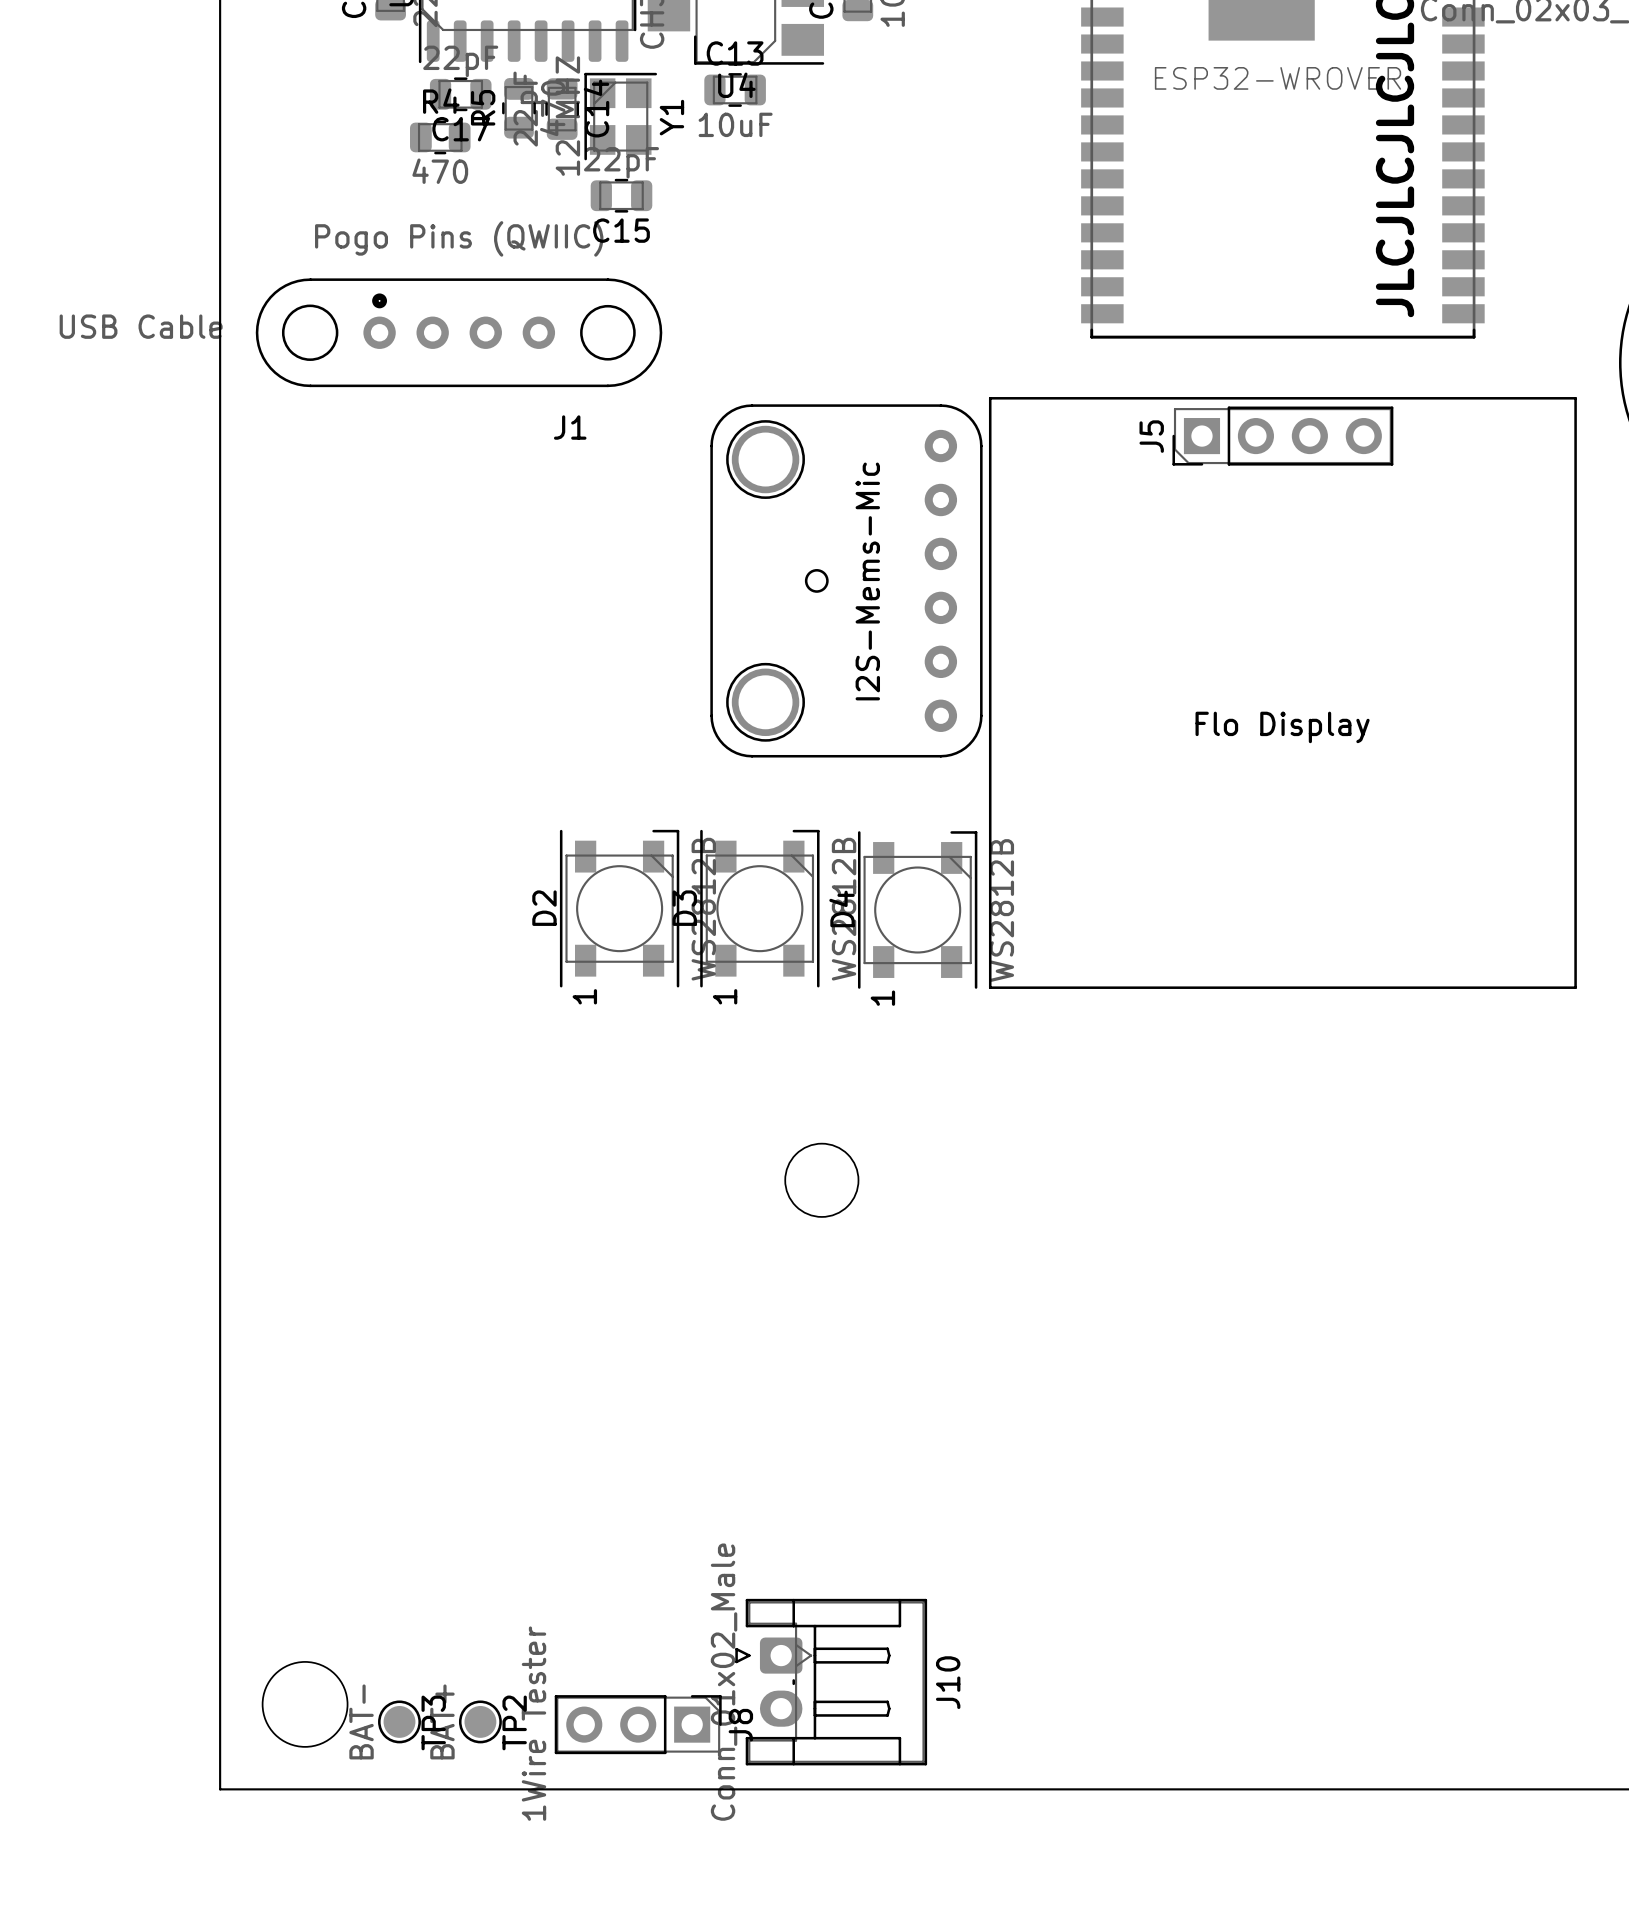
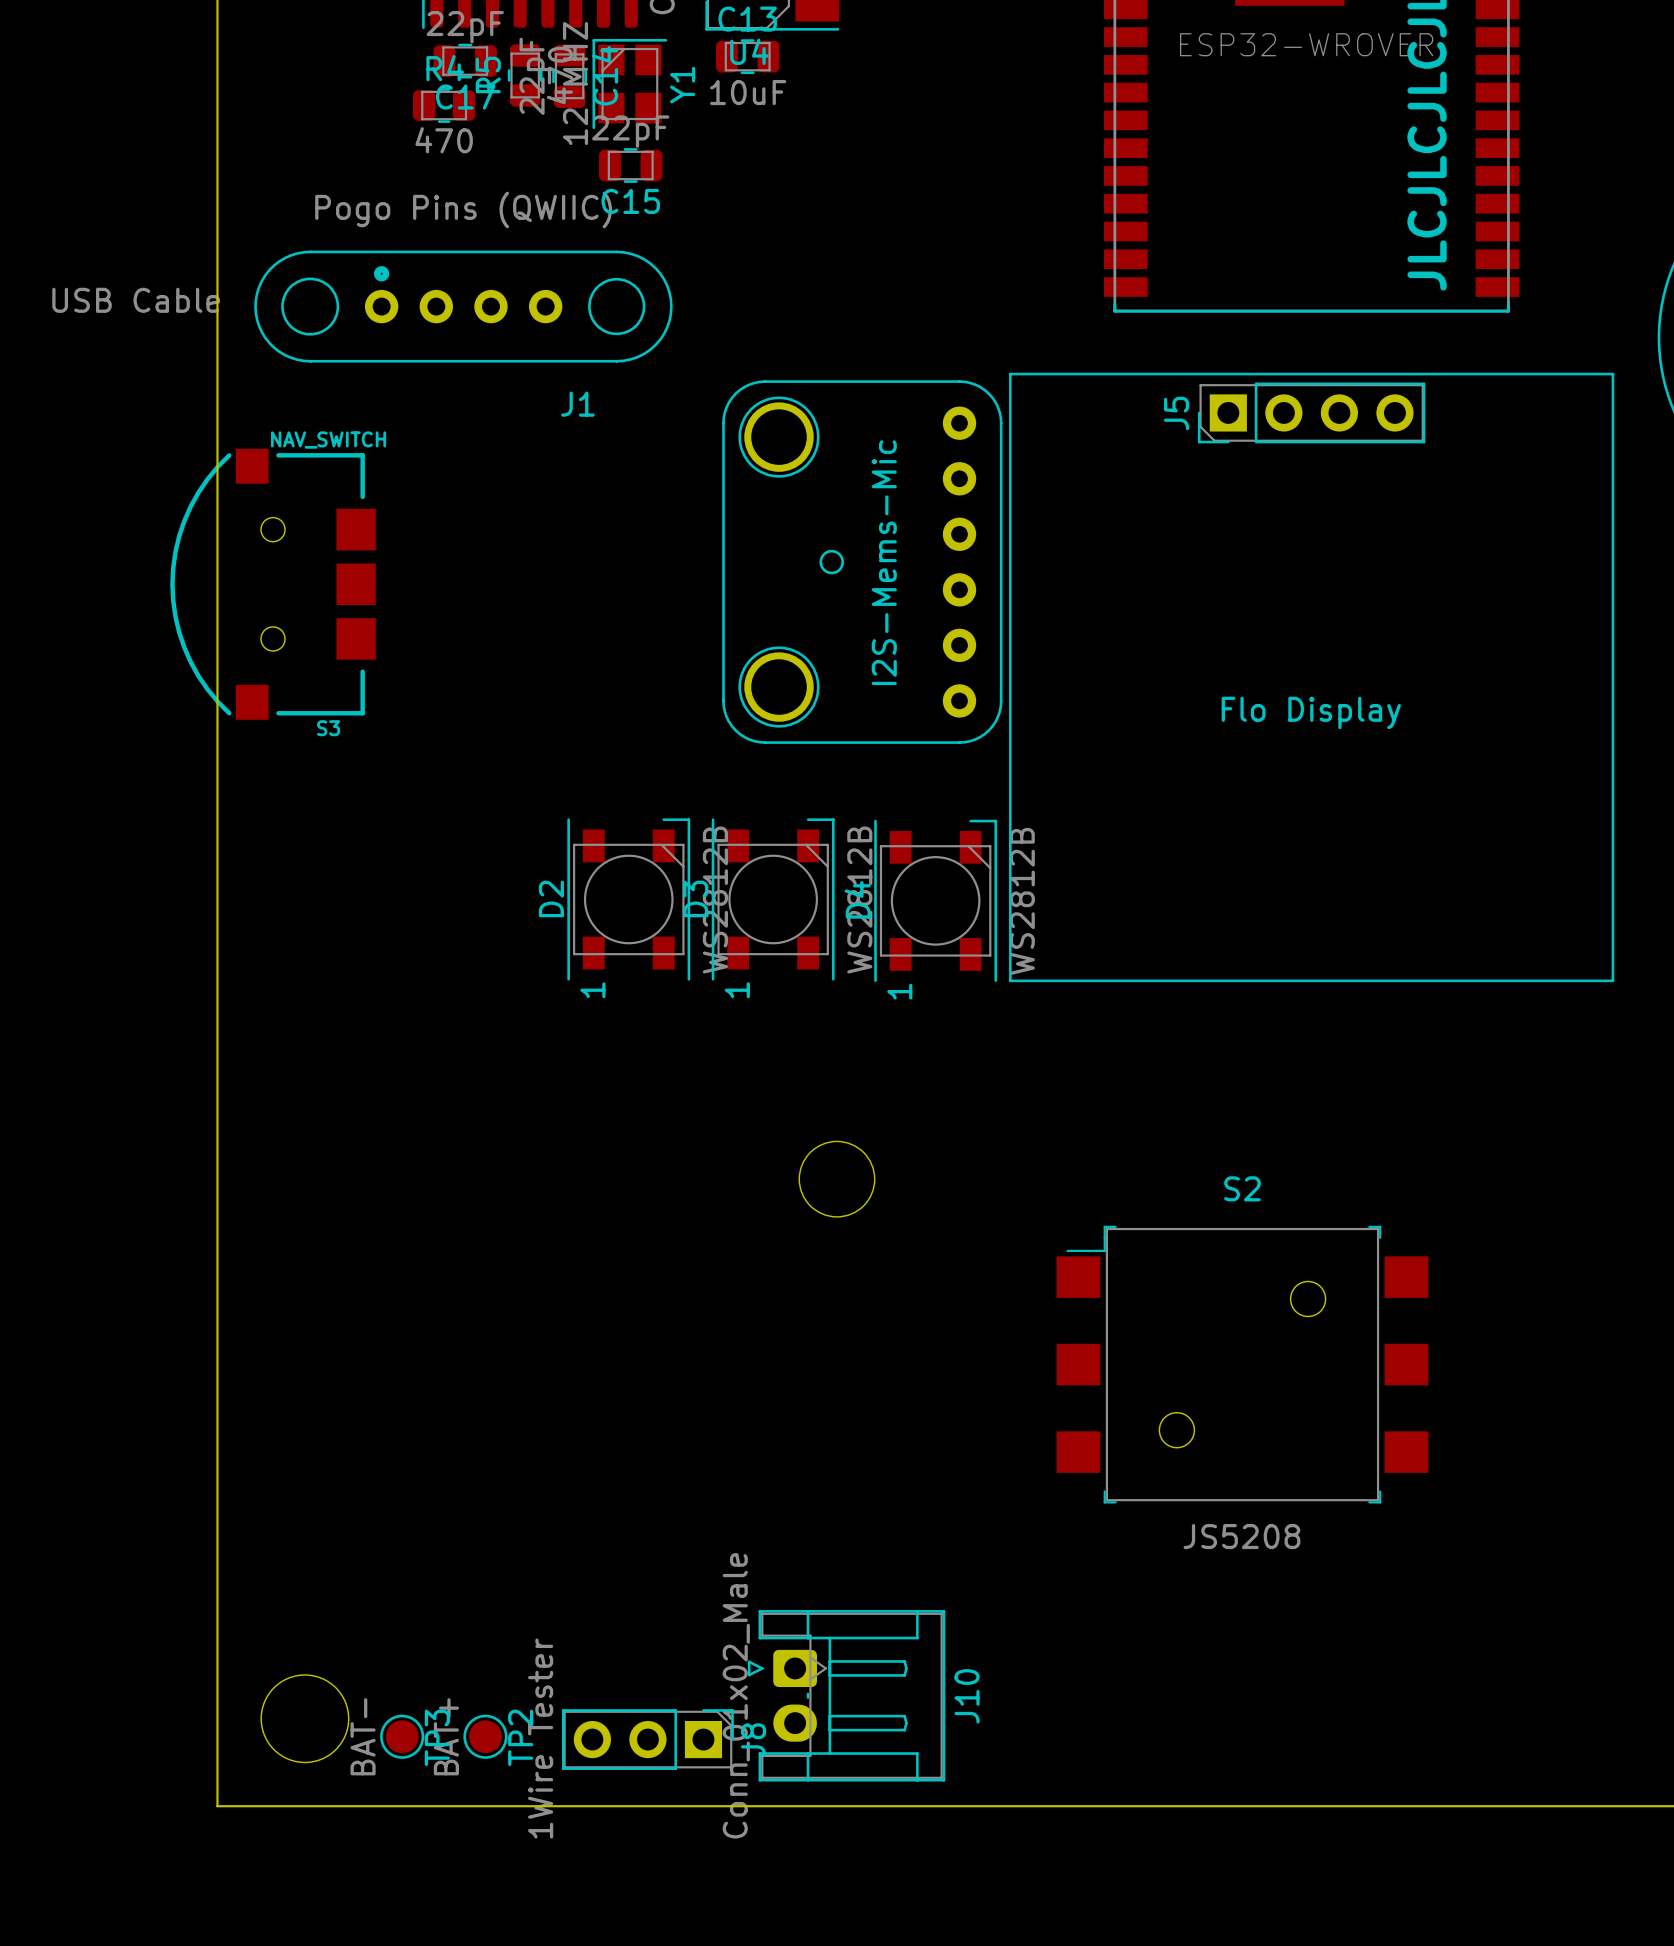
S3: none -> NAV_SWITCH (273, 584)
S2: none -> JS5208 (1242, 1364)

